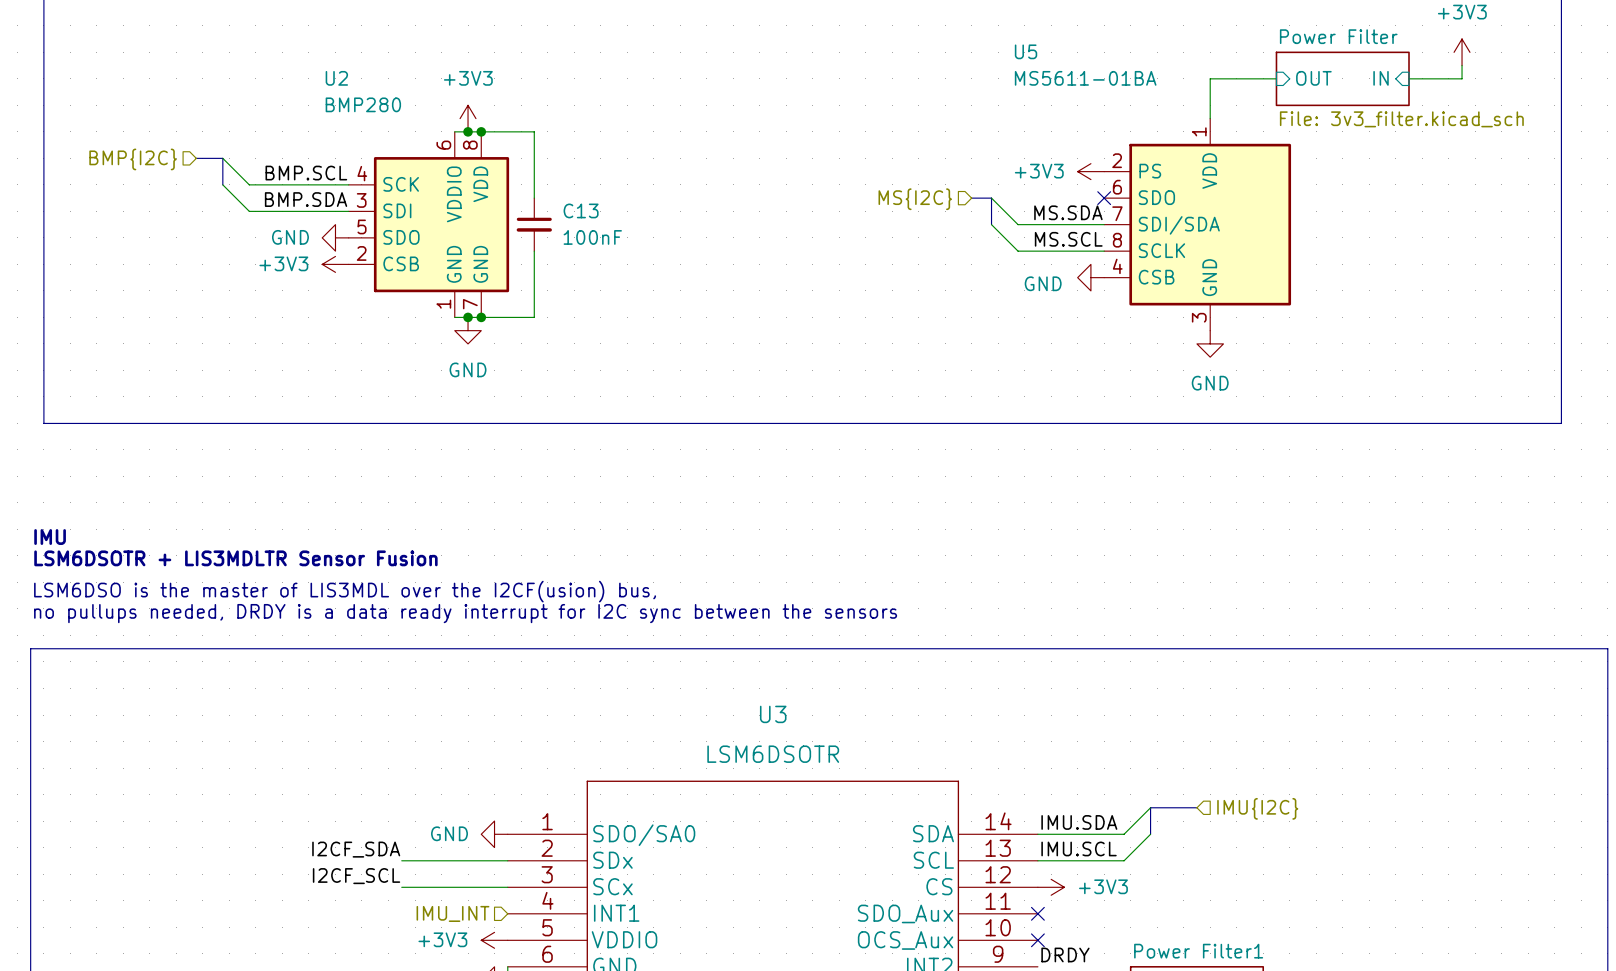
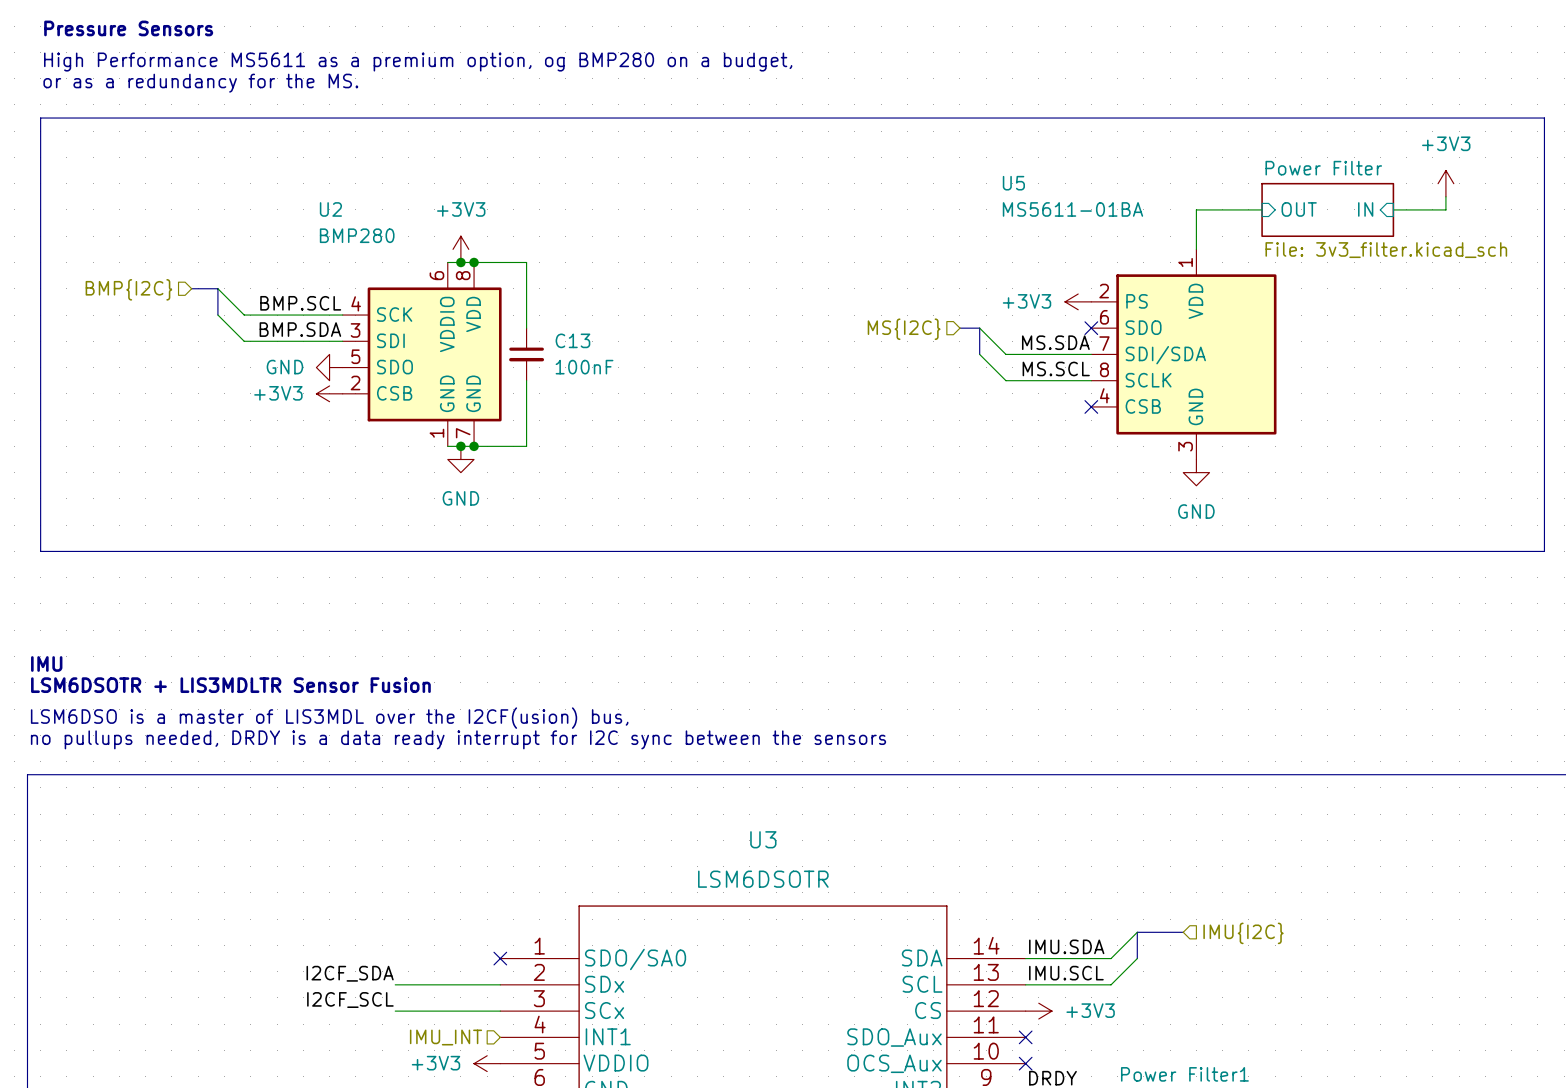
power symbol: GND (1090, 277) -> none
no-connect mark: none -> (1091, 406)
text: LSM6DSO is the master of LIS3MDL over the I2CF(usion) bus, (345, 591) -> LSM6DSO is a master of LIS3MDL over the I2CF(usion) bus, (329, 718)
power symbol: GND (494, 834) -> none
no-connect mark: none -> (500, 958)

